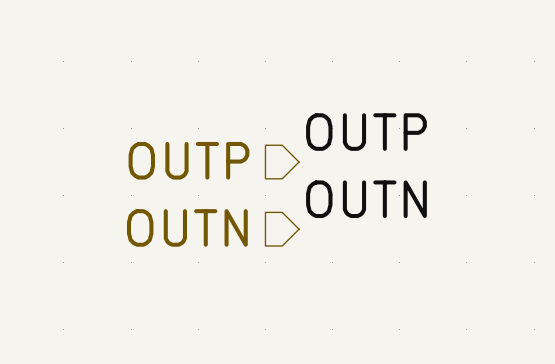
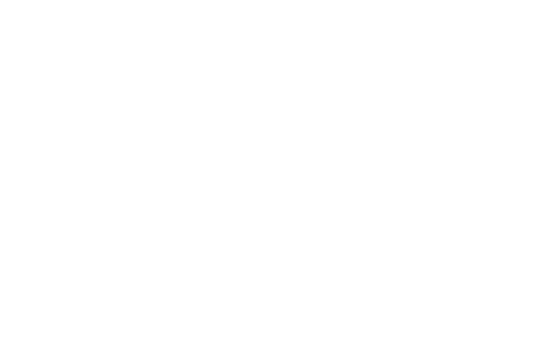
label: OUTP (366, 132) -> none
hierarchical label: OUTP (188, 160) -> none
label: OUTN (366, 199) -> none
hierarchical label: OUTN (187, 227) -> none

